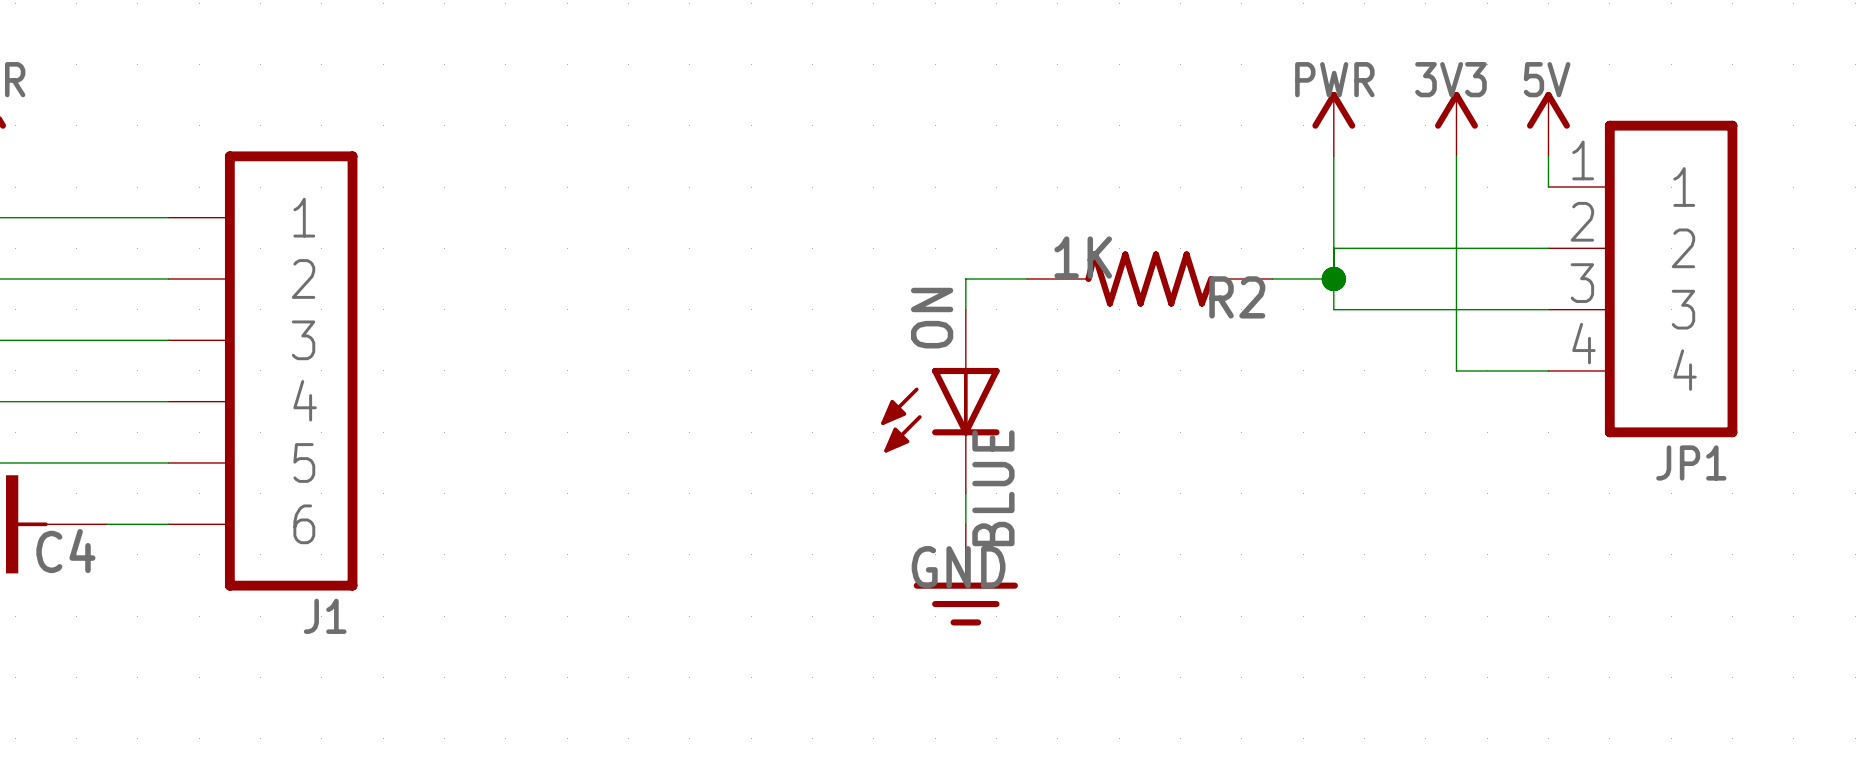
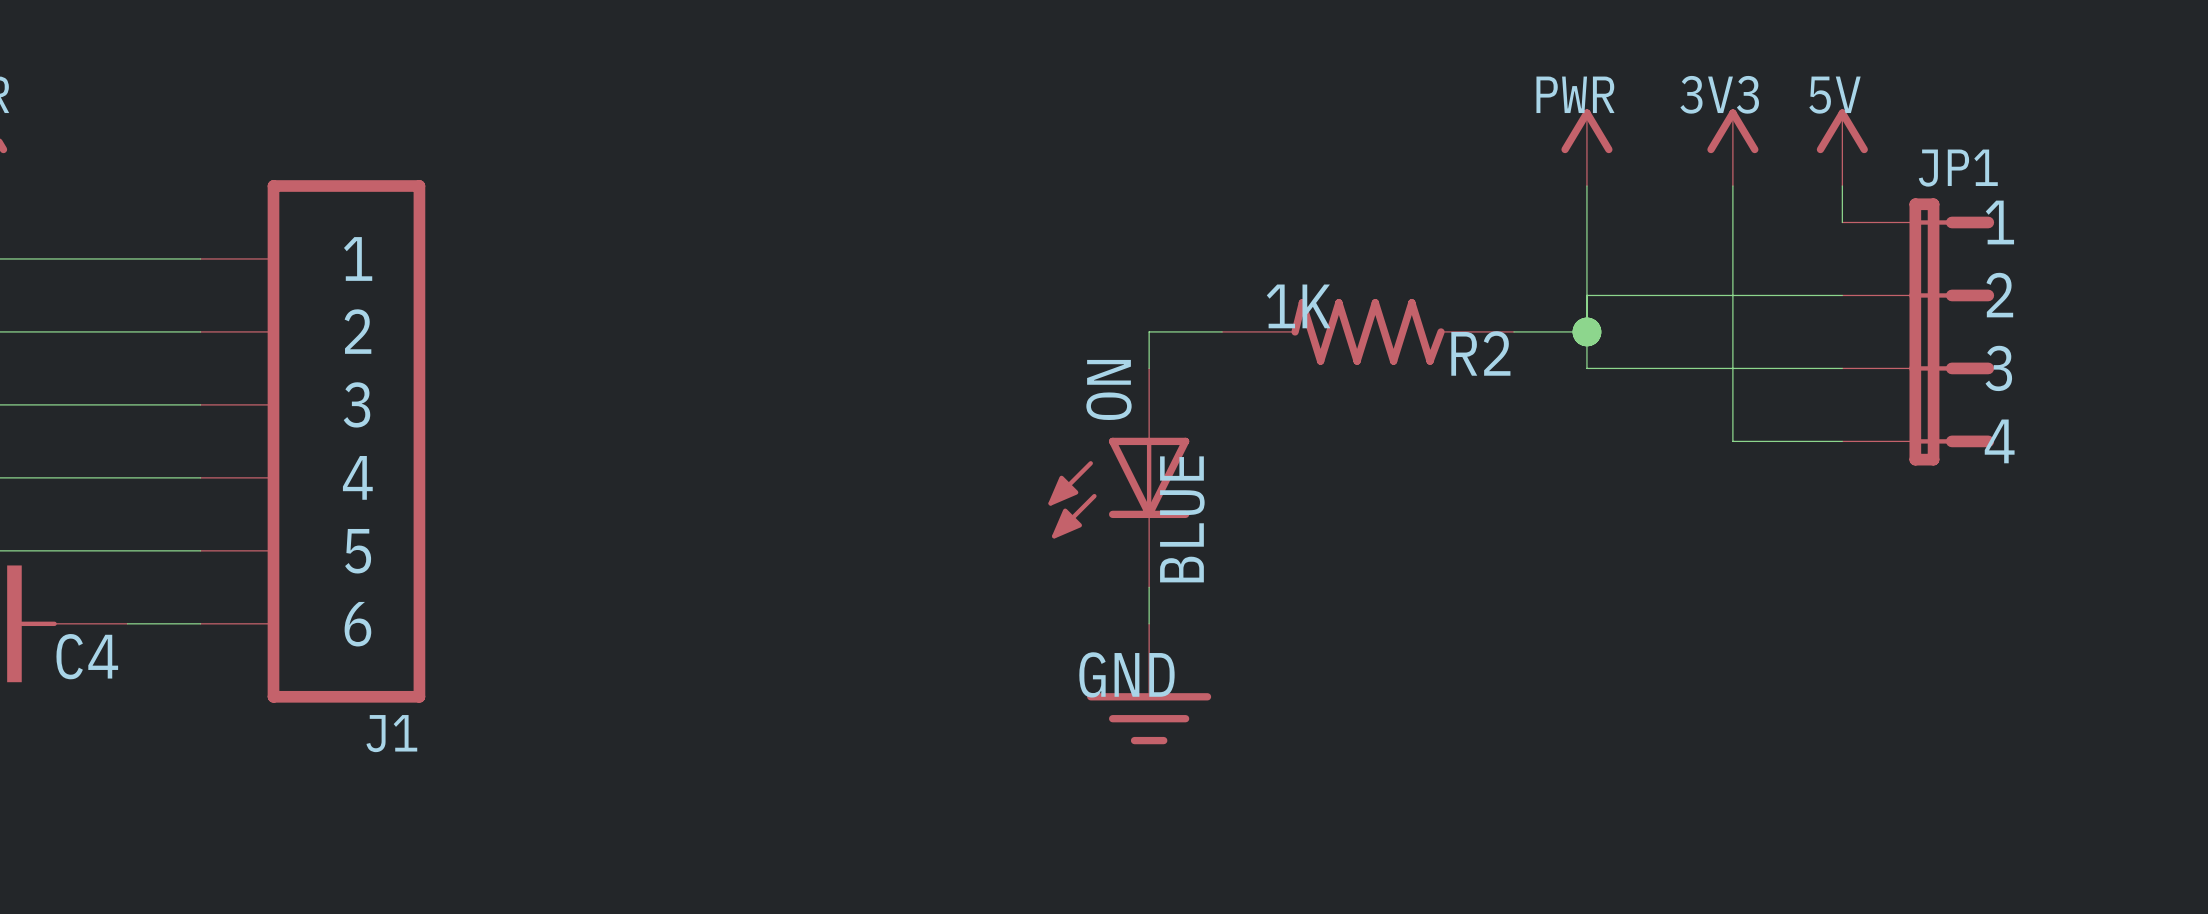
JP1 symbol: [1548, 120, 1738, 438] -> [1842, 198, 1995, 466]
JP1 name position: JP1 (1691, 462) -> JP1 (1958, 168)
ON value position: BLUE (993, 488) -> BLUE (1182, 519)

